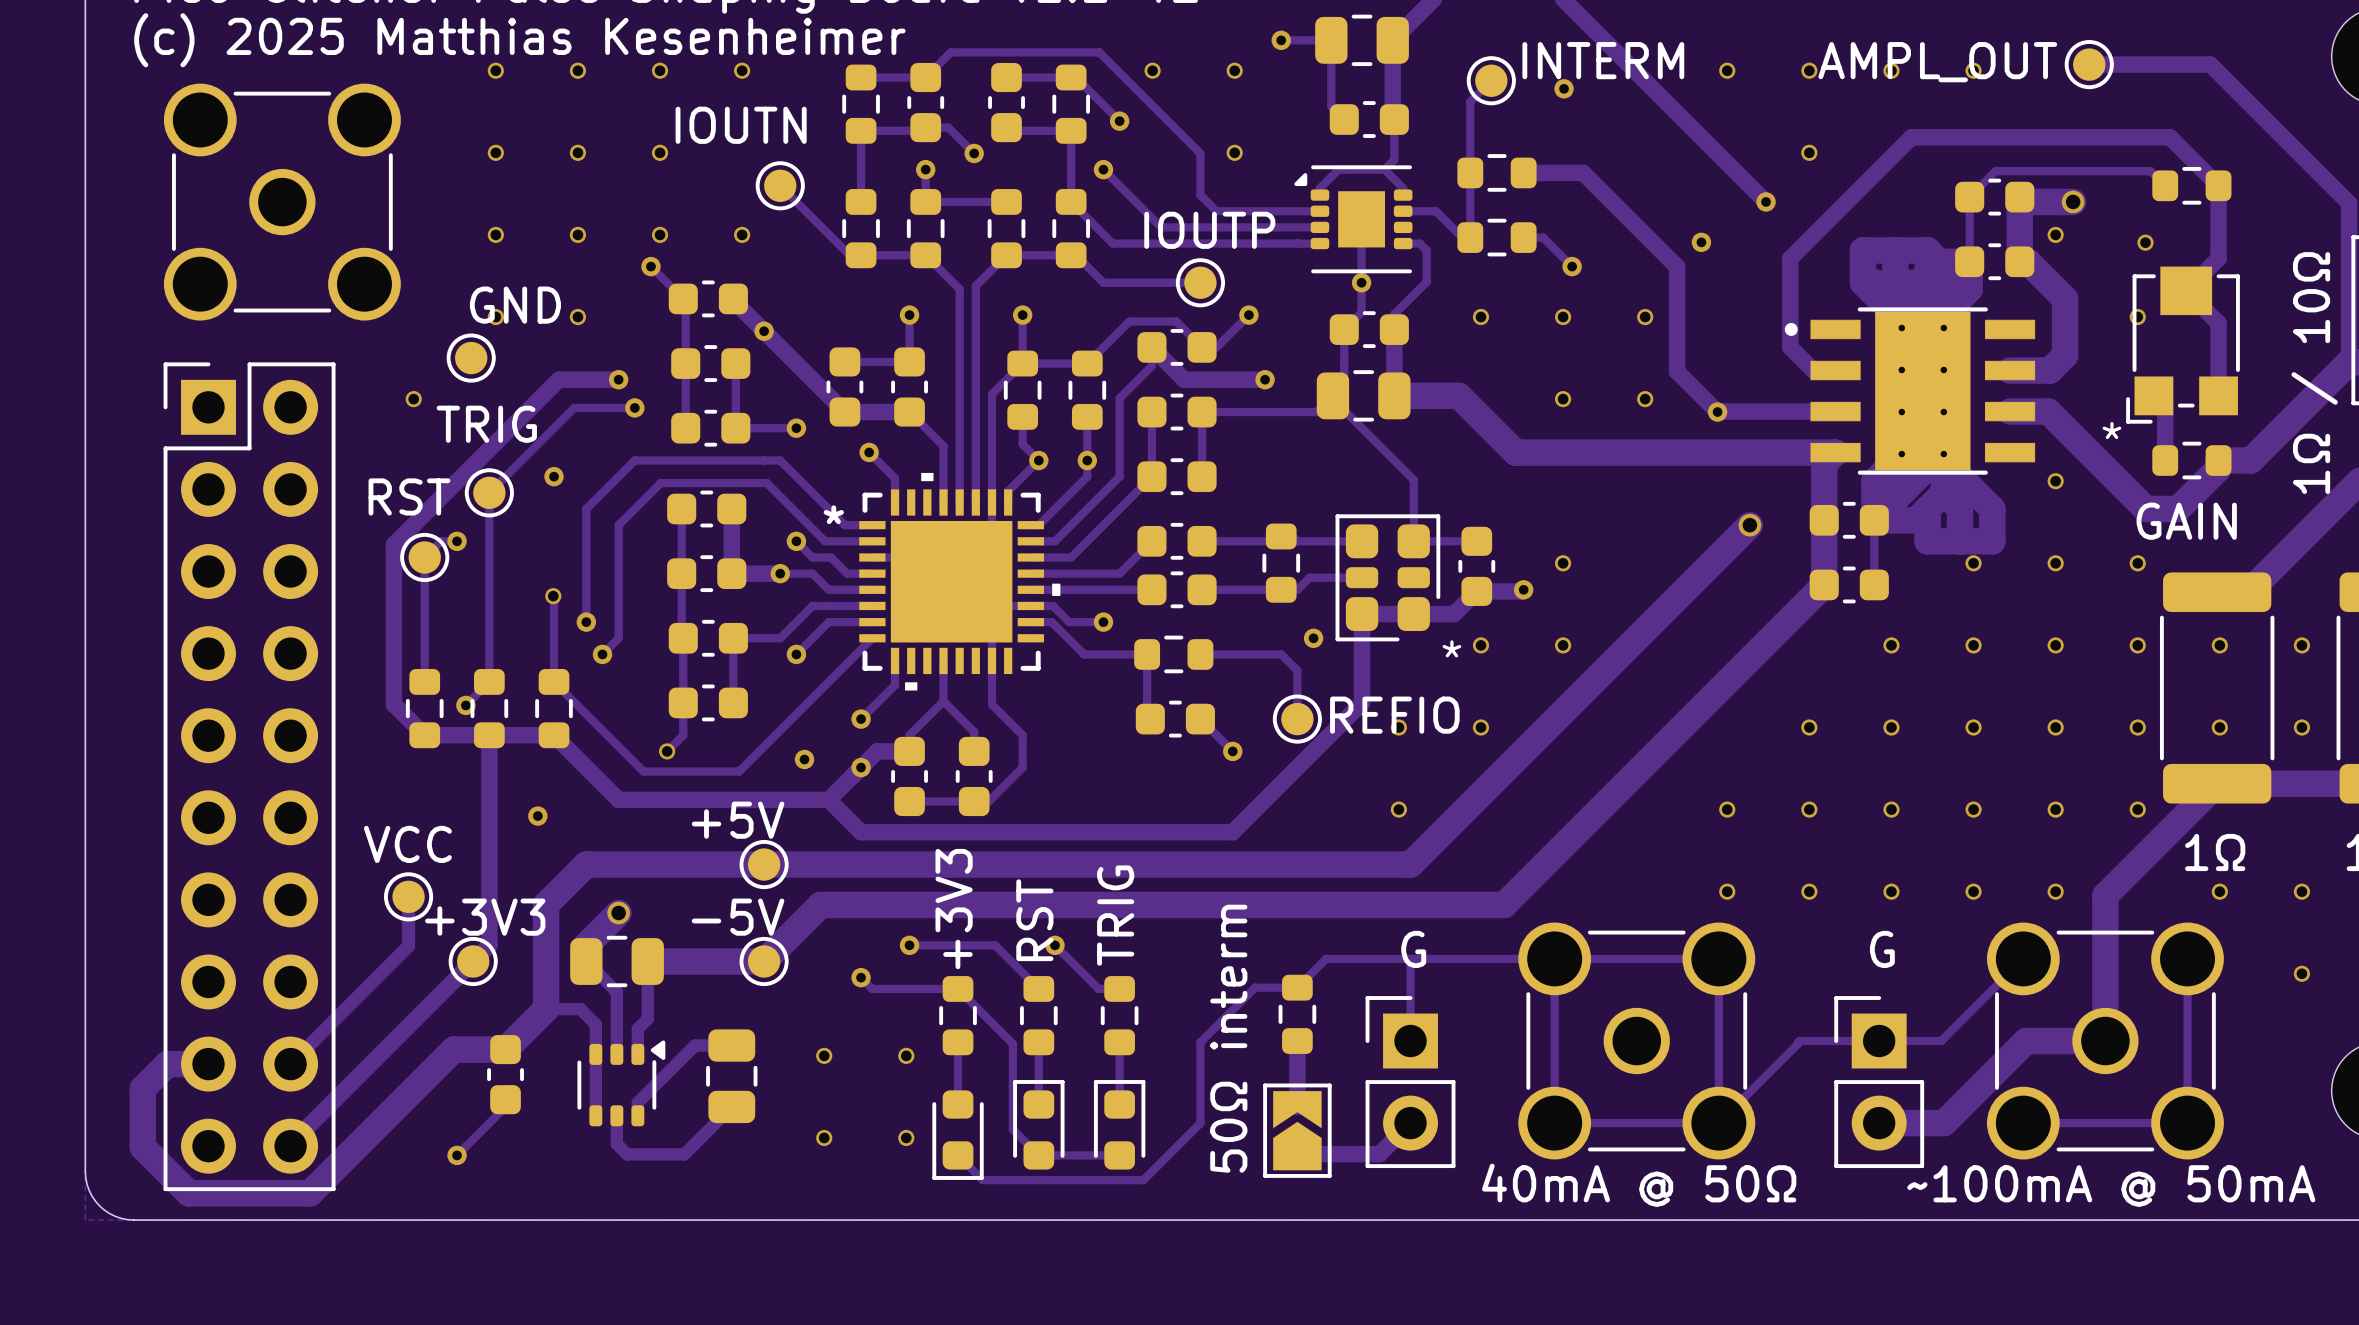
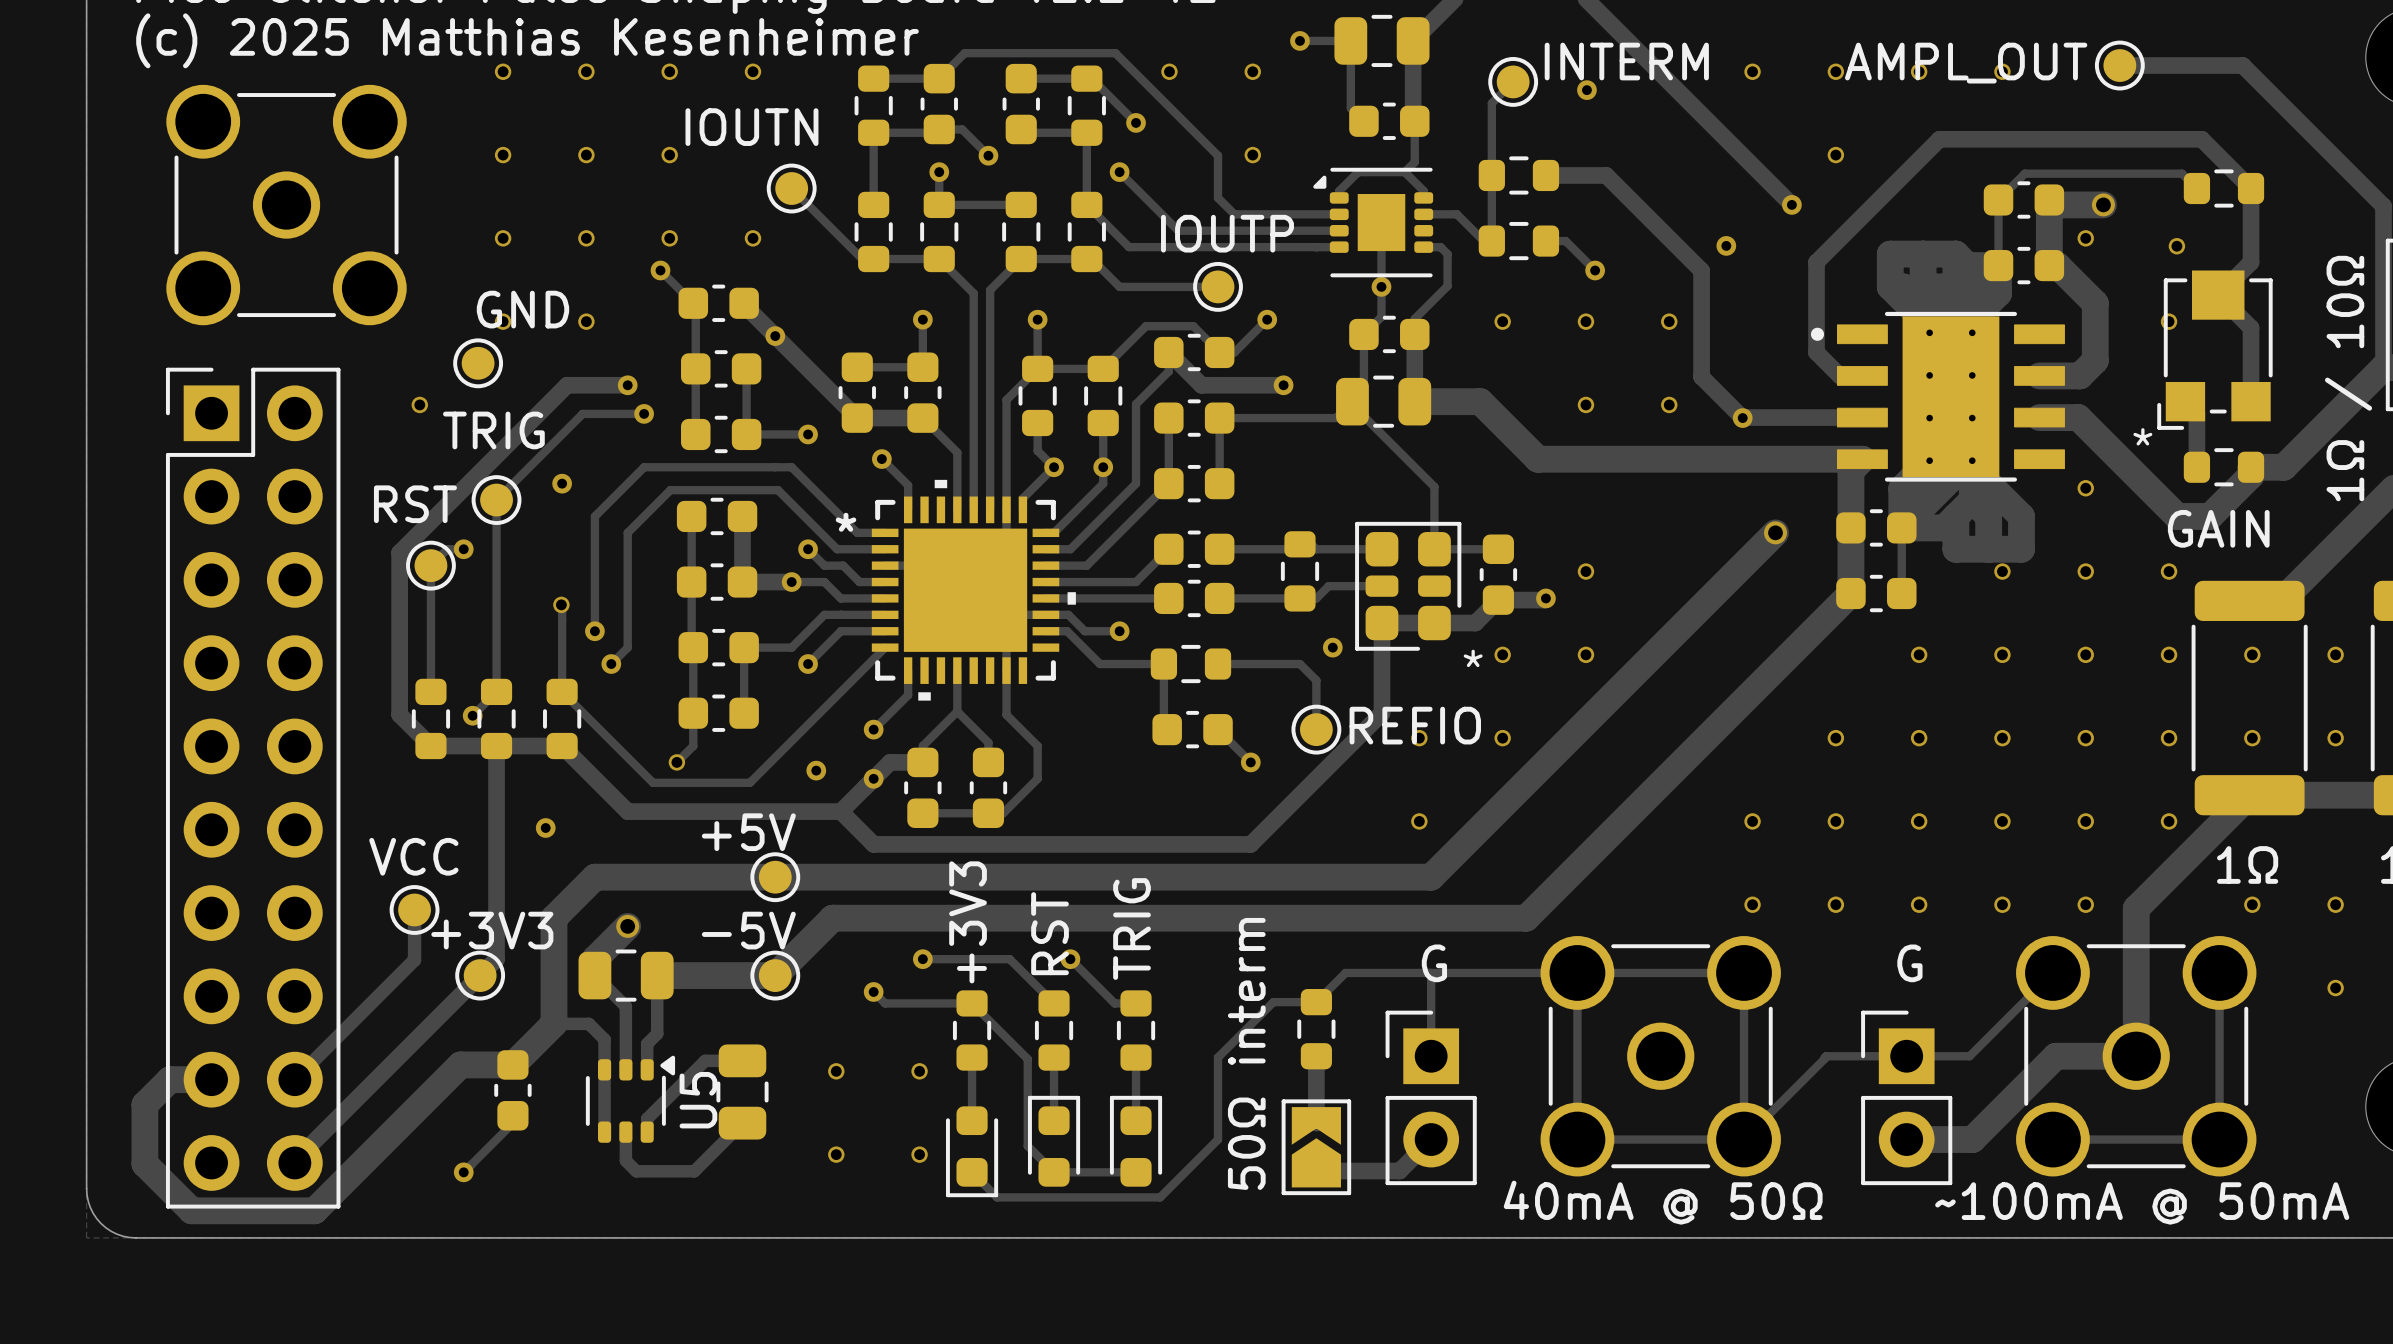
U5 name: none -> U5 (698, 1100)

